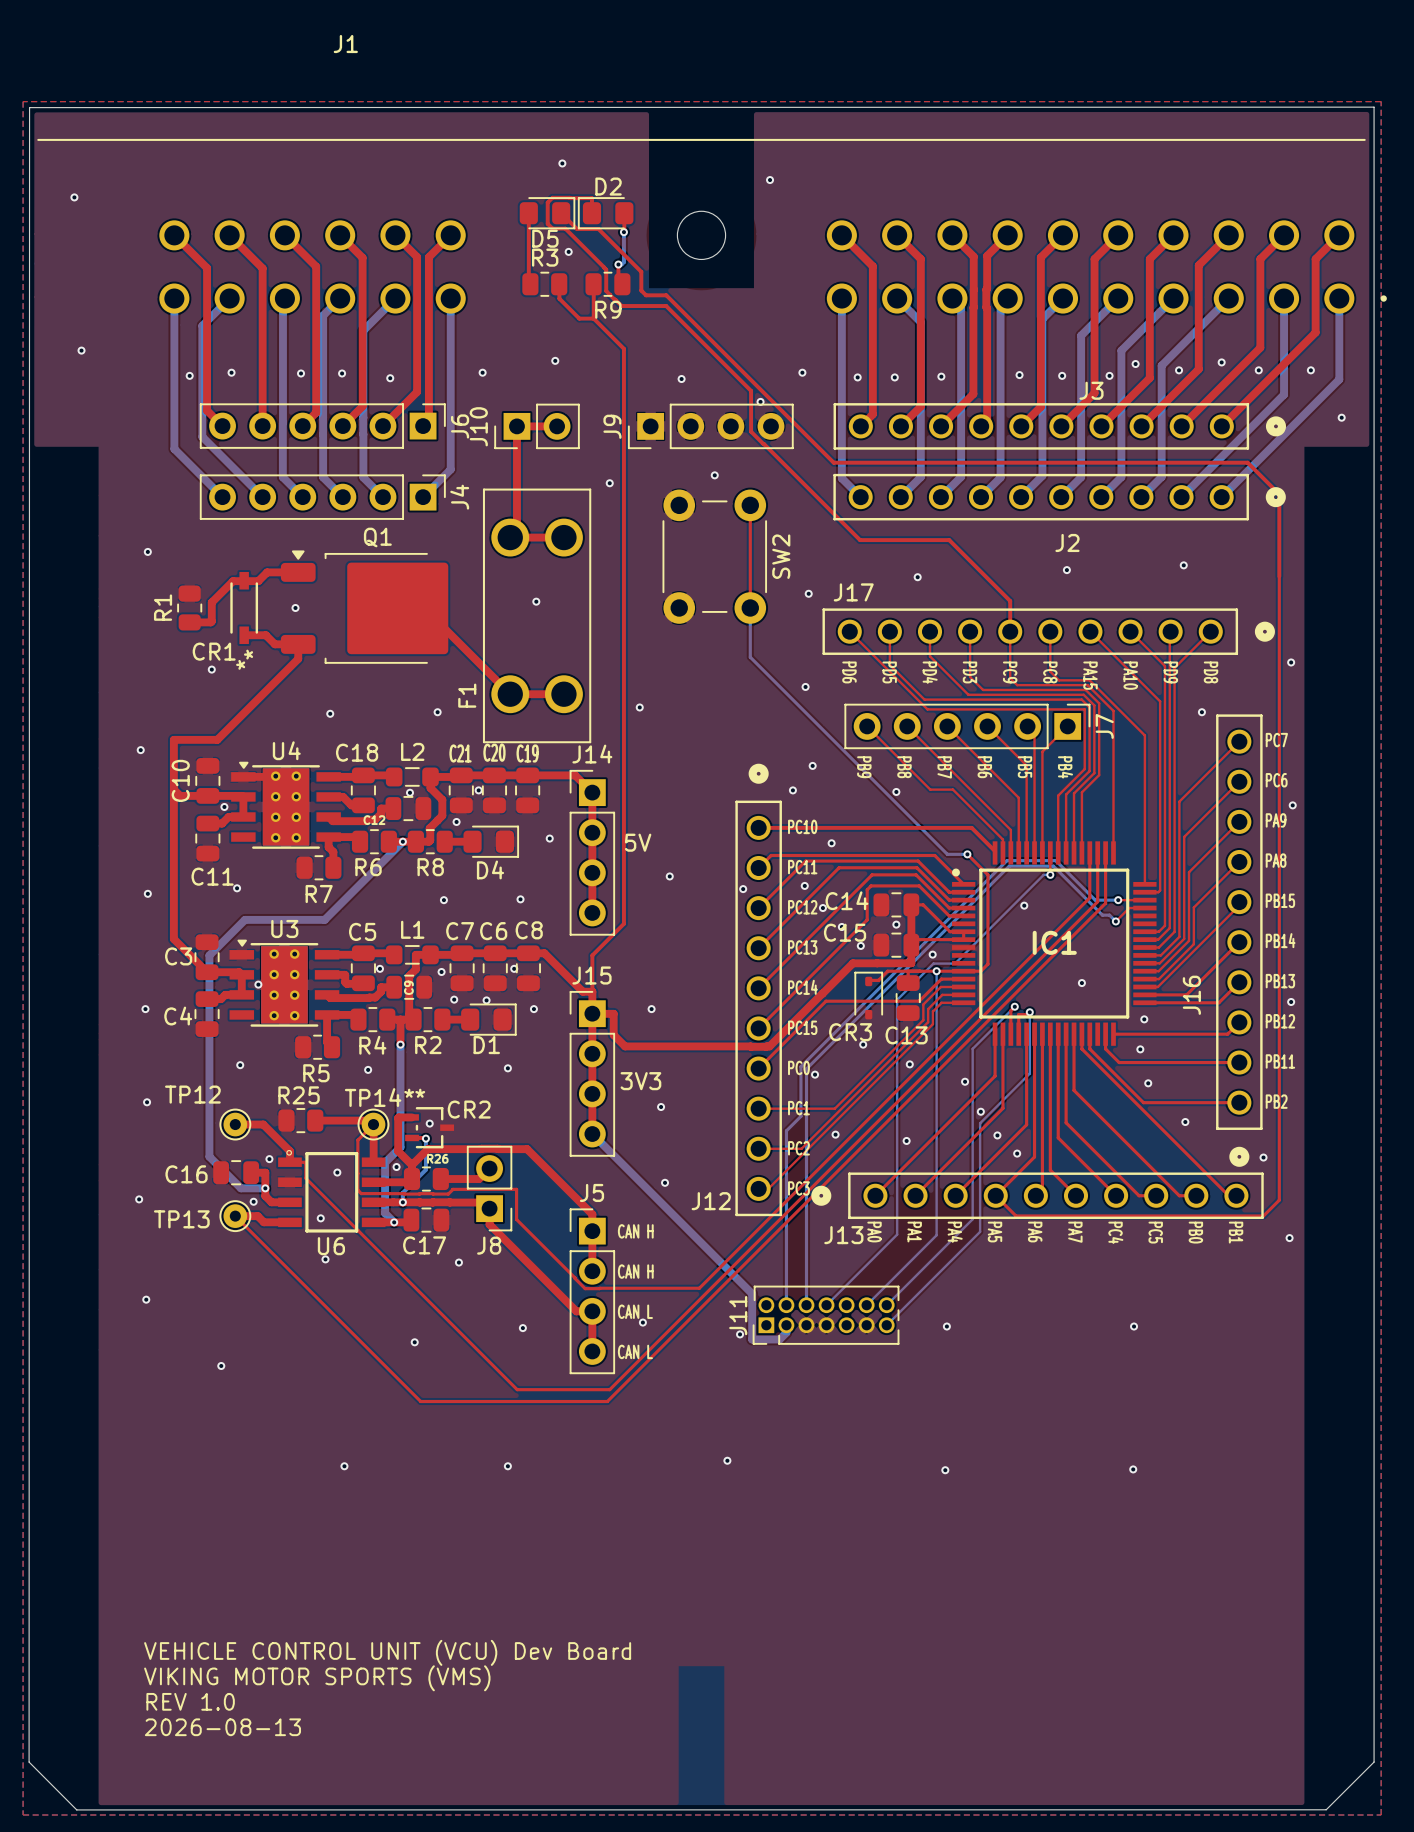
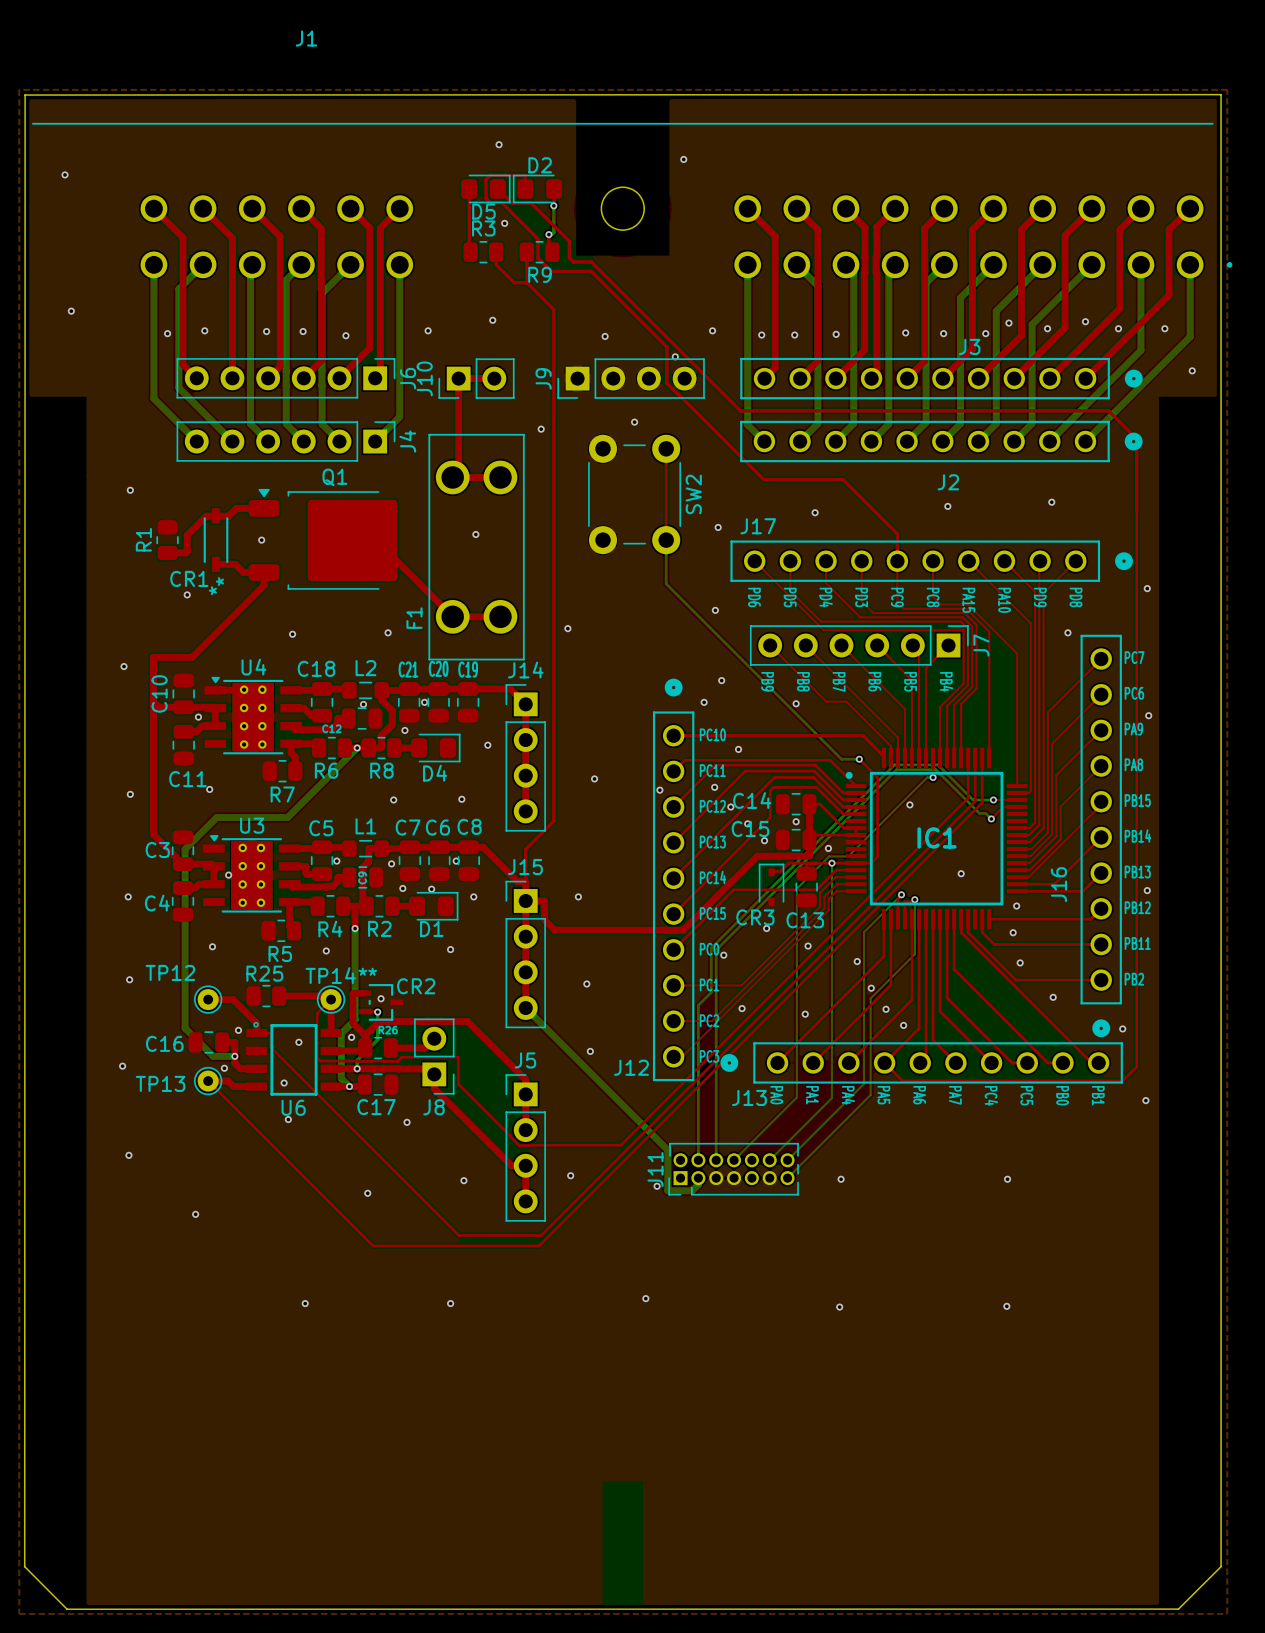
J14 value: 5V (638, 842) -> none
J15 value: 3V3 (640, 1081) -> none
text: CAN H (635, 1231) -> none
text: CAN H (635, 1271) -> none
text: CAN L (635, 1311) -> none
text: CAN L (635, 1351) -> none
text: VEHICLE CONTROL UNIT (VCU) Dev Board (387, 1652) -> none
text: VIKING MOTOR SPORTS (VMS) (317, 1678) -> none
text: REV 1.0 (190, 1701) -> none
text: 2026-08-13 (222, 1727) -> none

